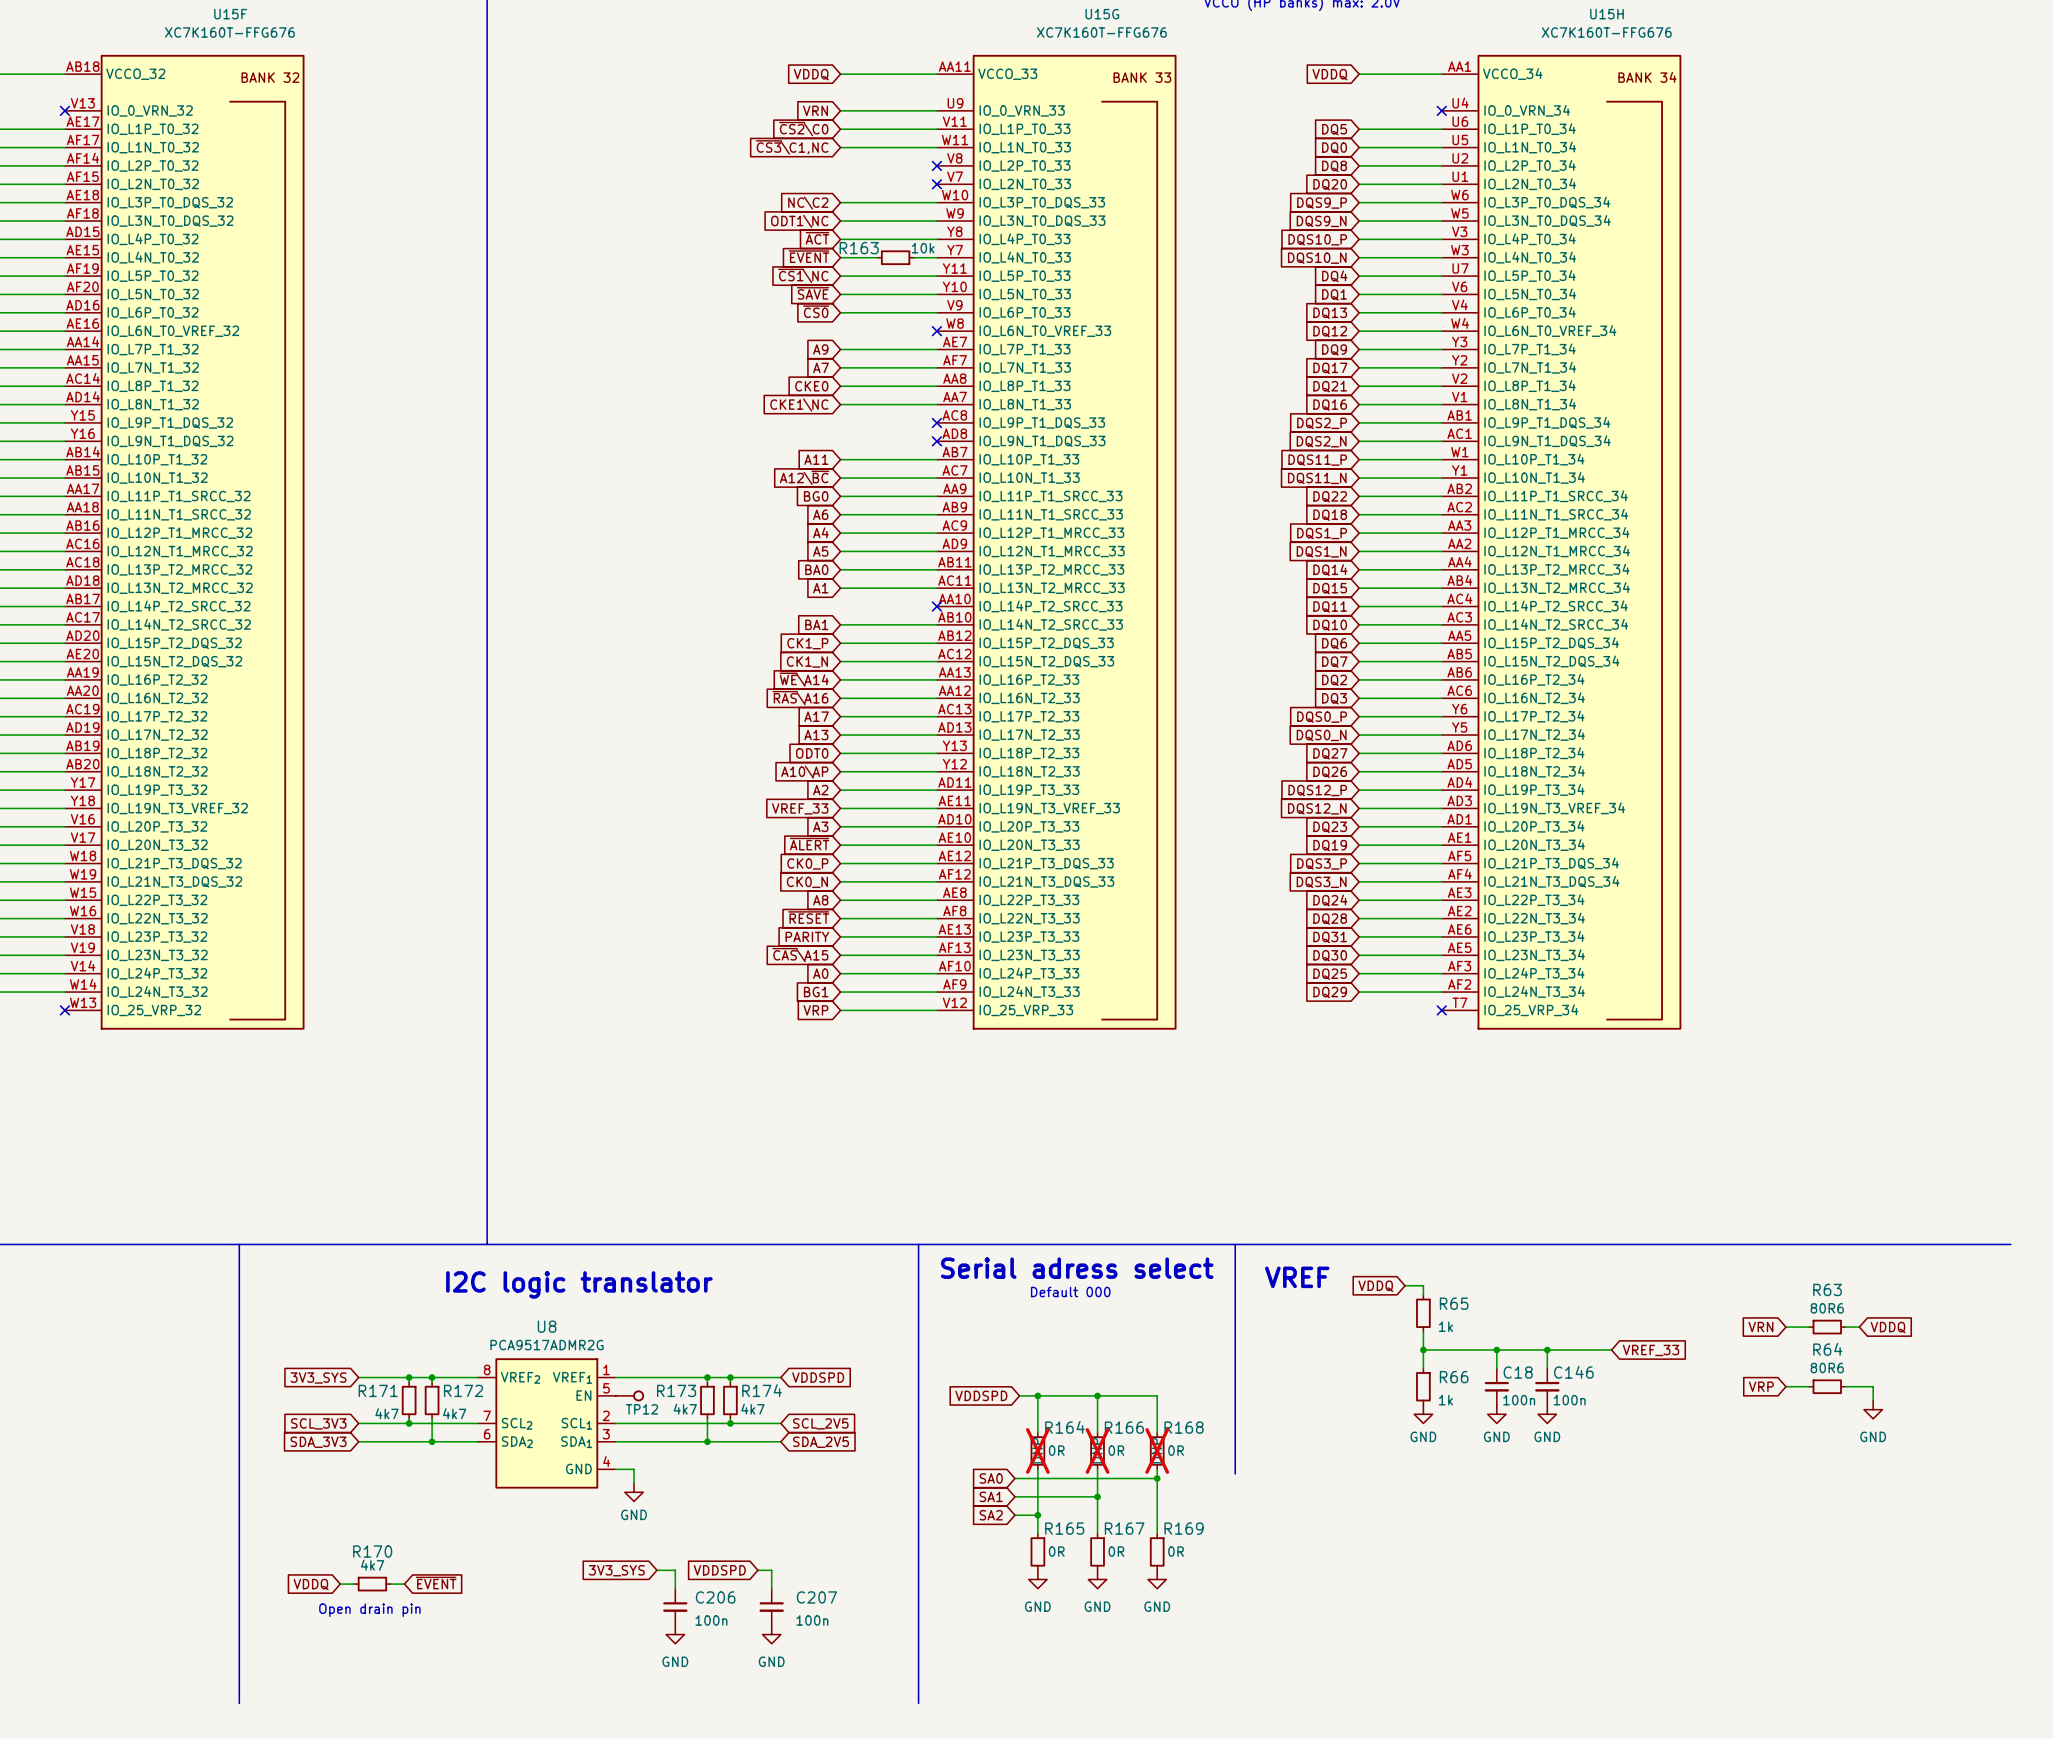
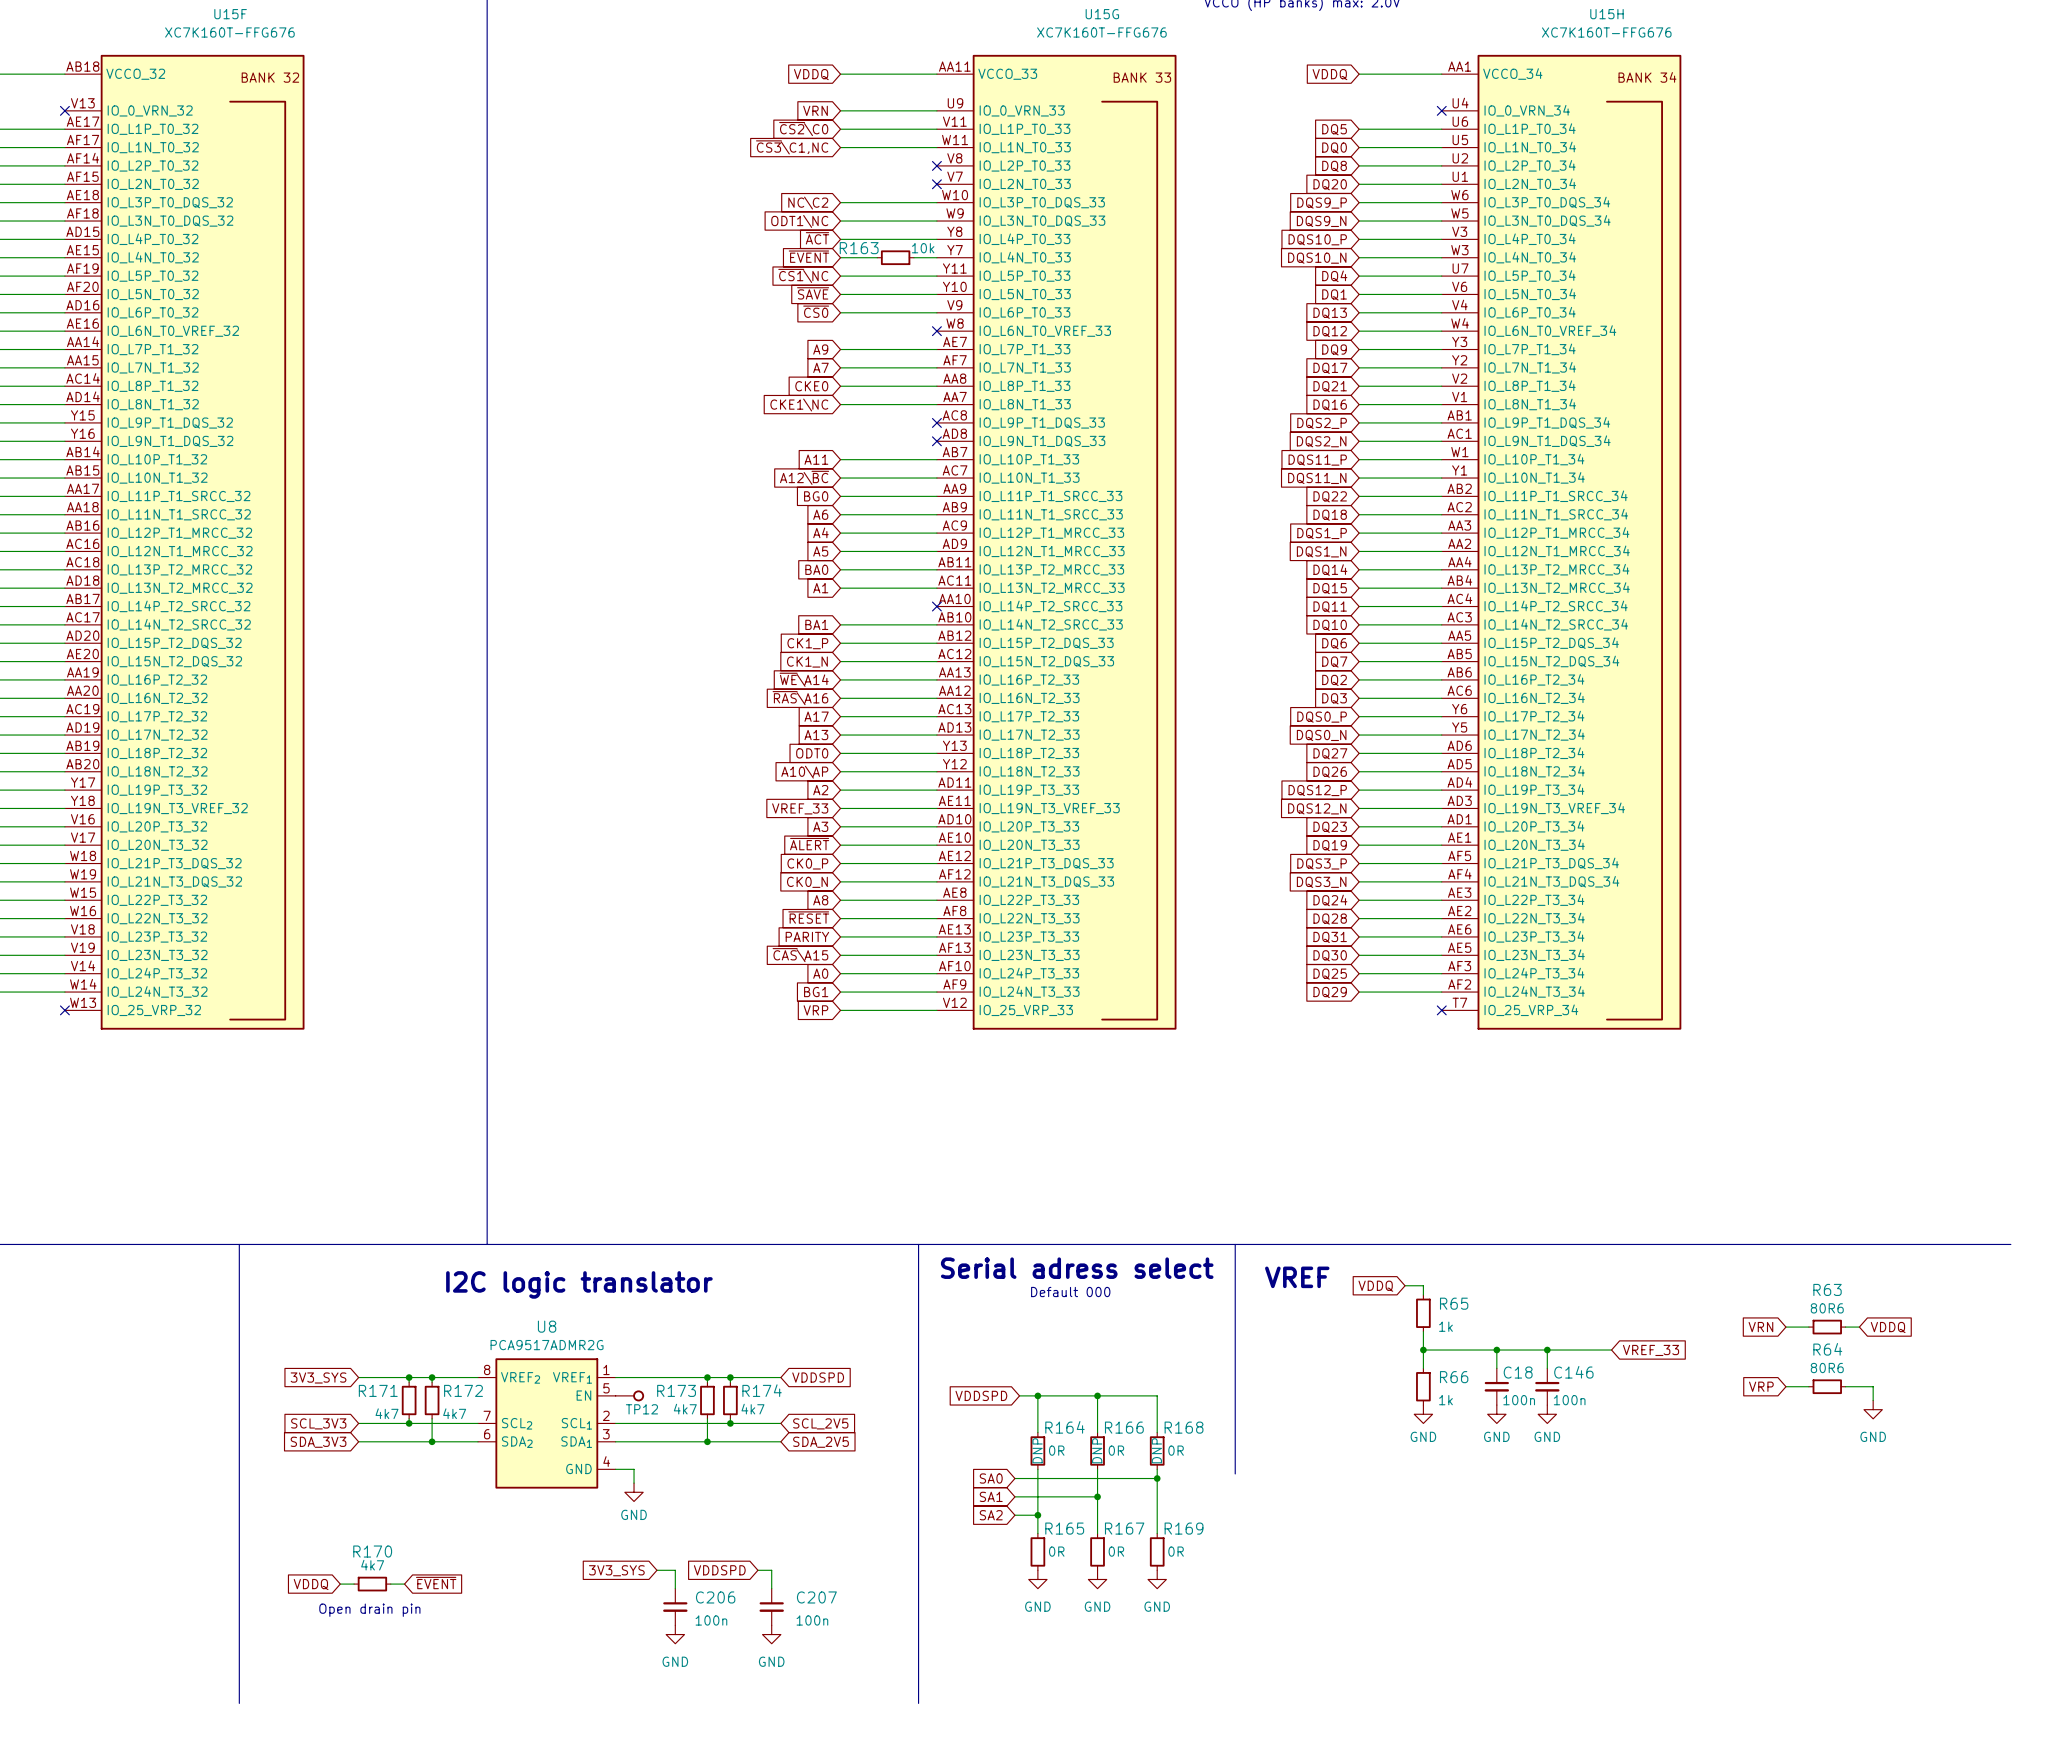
R164 do-not-place cross: (1037, 1450) -> none
R166 do-not-place cross: (1097, 1450) -> none
R168 do-not-place cross: (1157, 1450) -> none

